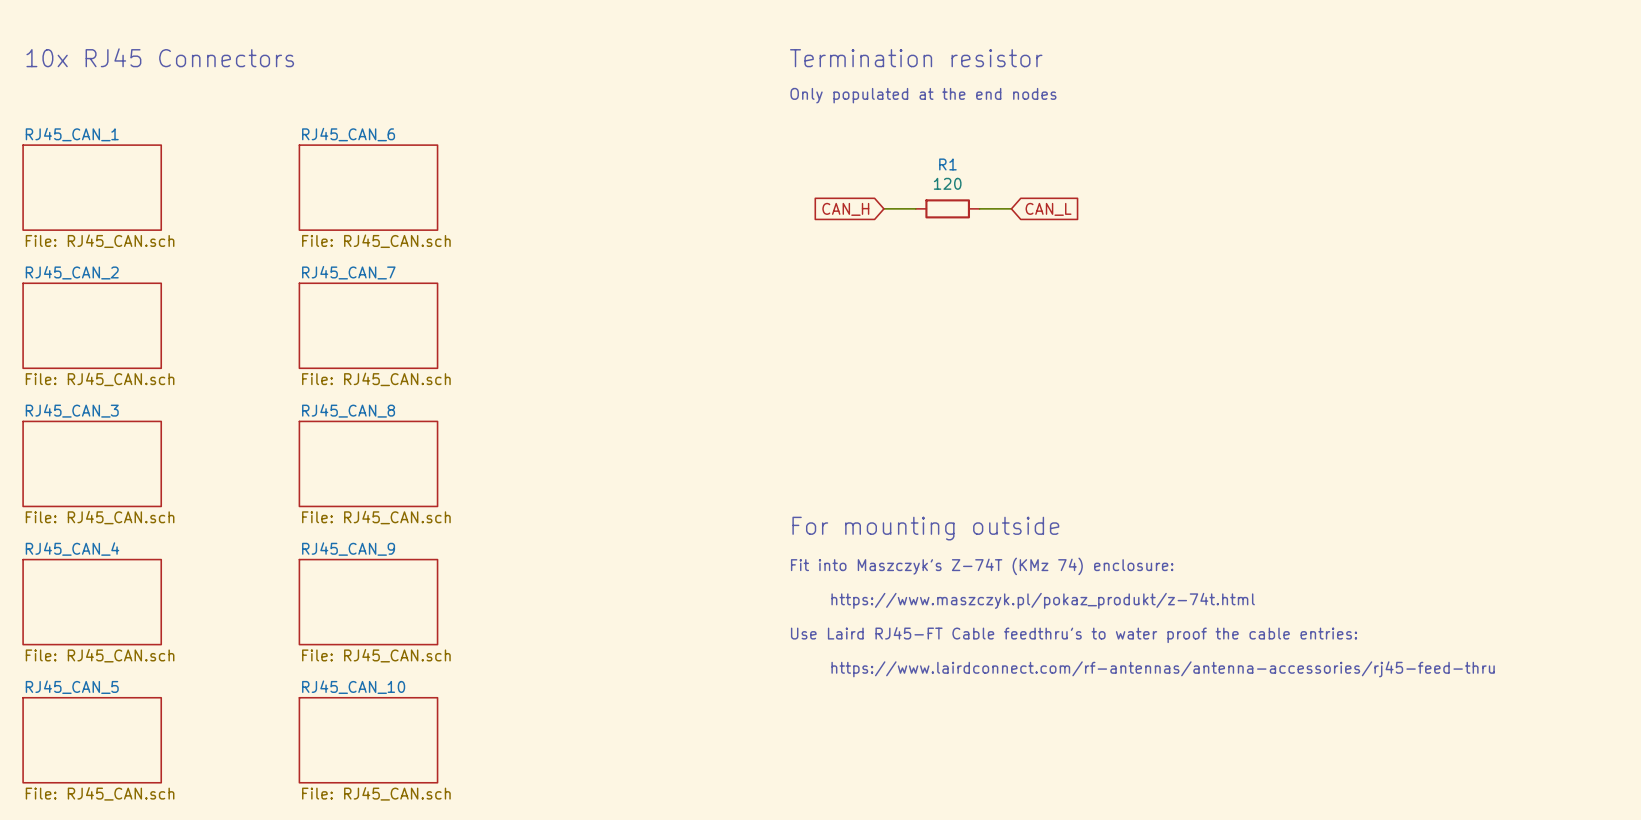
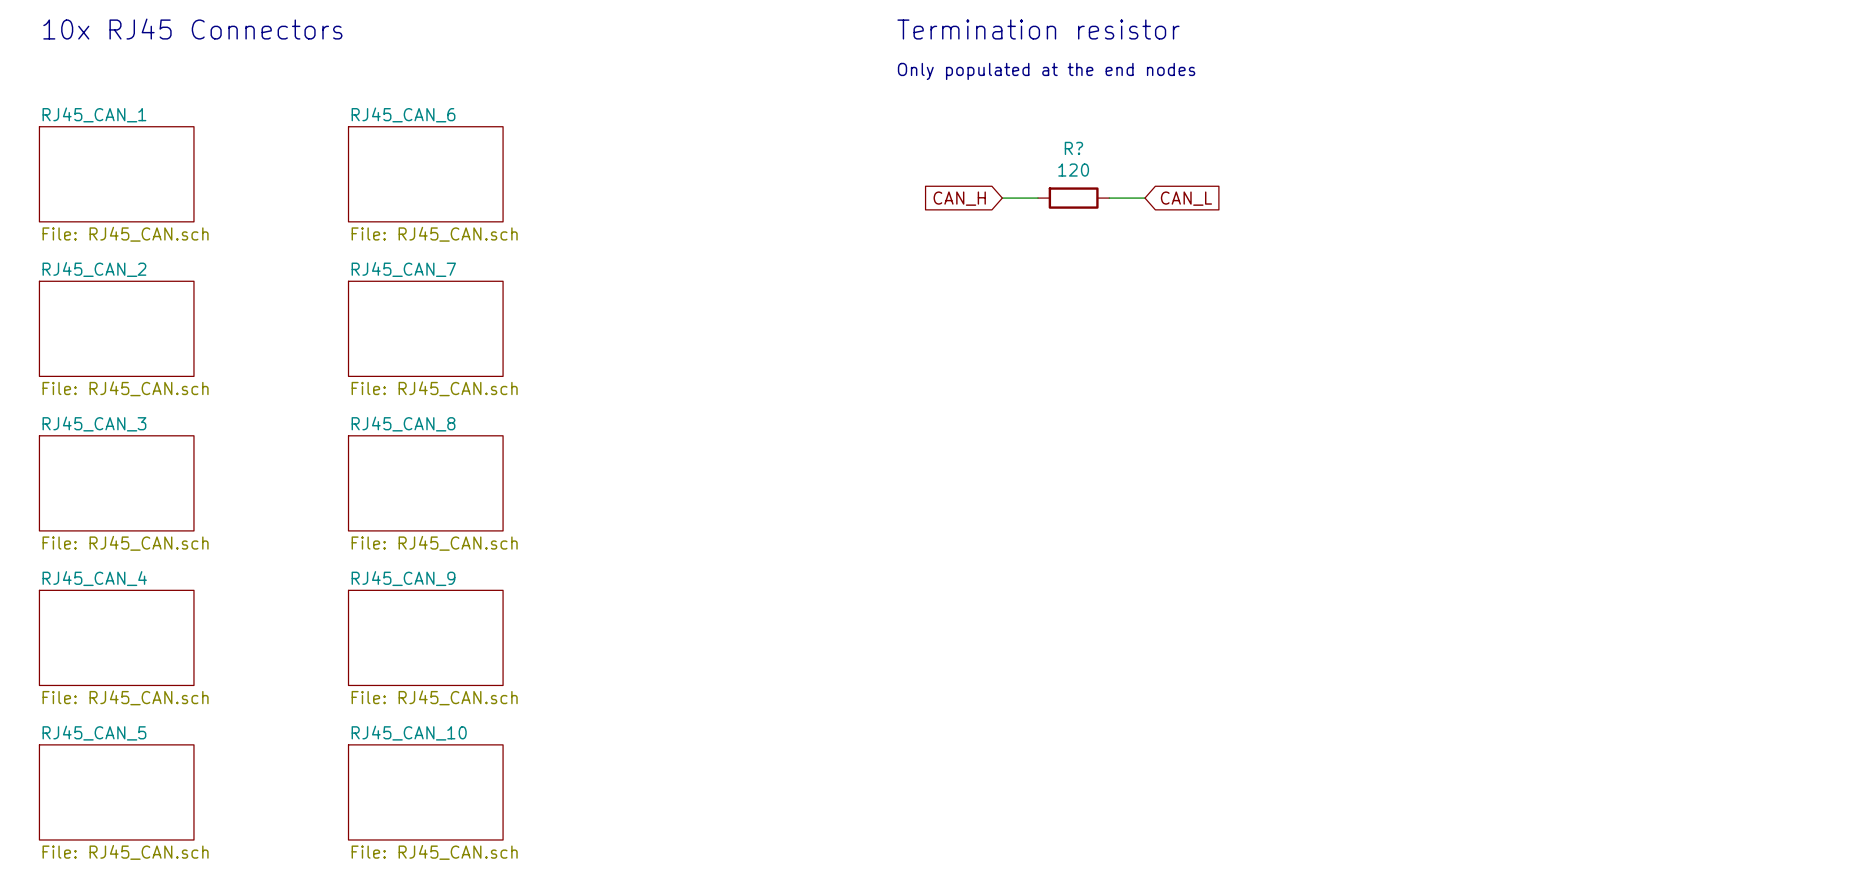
R1 name: R1 (947, 164) -> R? (1073, 148)
text: For mounting outside (925, 528) -> none
text: Fit into Maszczyk's Z-74T (KMz 74) enclosure: (982, 566) -> none
text: https://www.maszczyk.pl/pokaz_produkt/z-74t.html (1043, 600) -> none
text: Use Laird RJ45-FT Cable feedthru's to water proof the cable entries: (1074, 635) -> none
text: https://www.lairdconnect.com/rf-antennas/antenna-accessories/rj45-feed-thru (1163, 669) -> none

